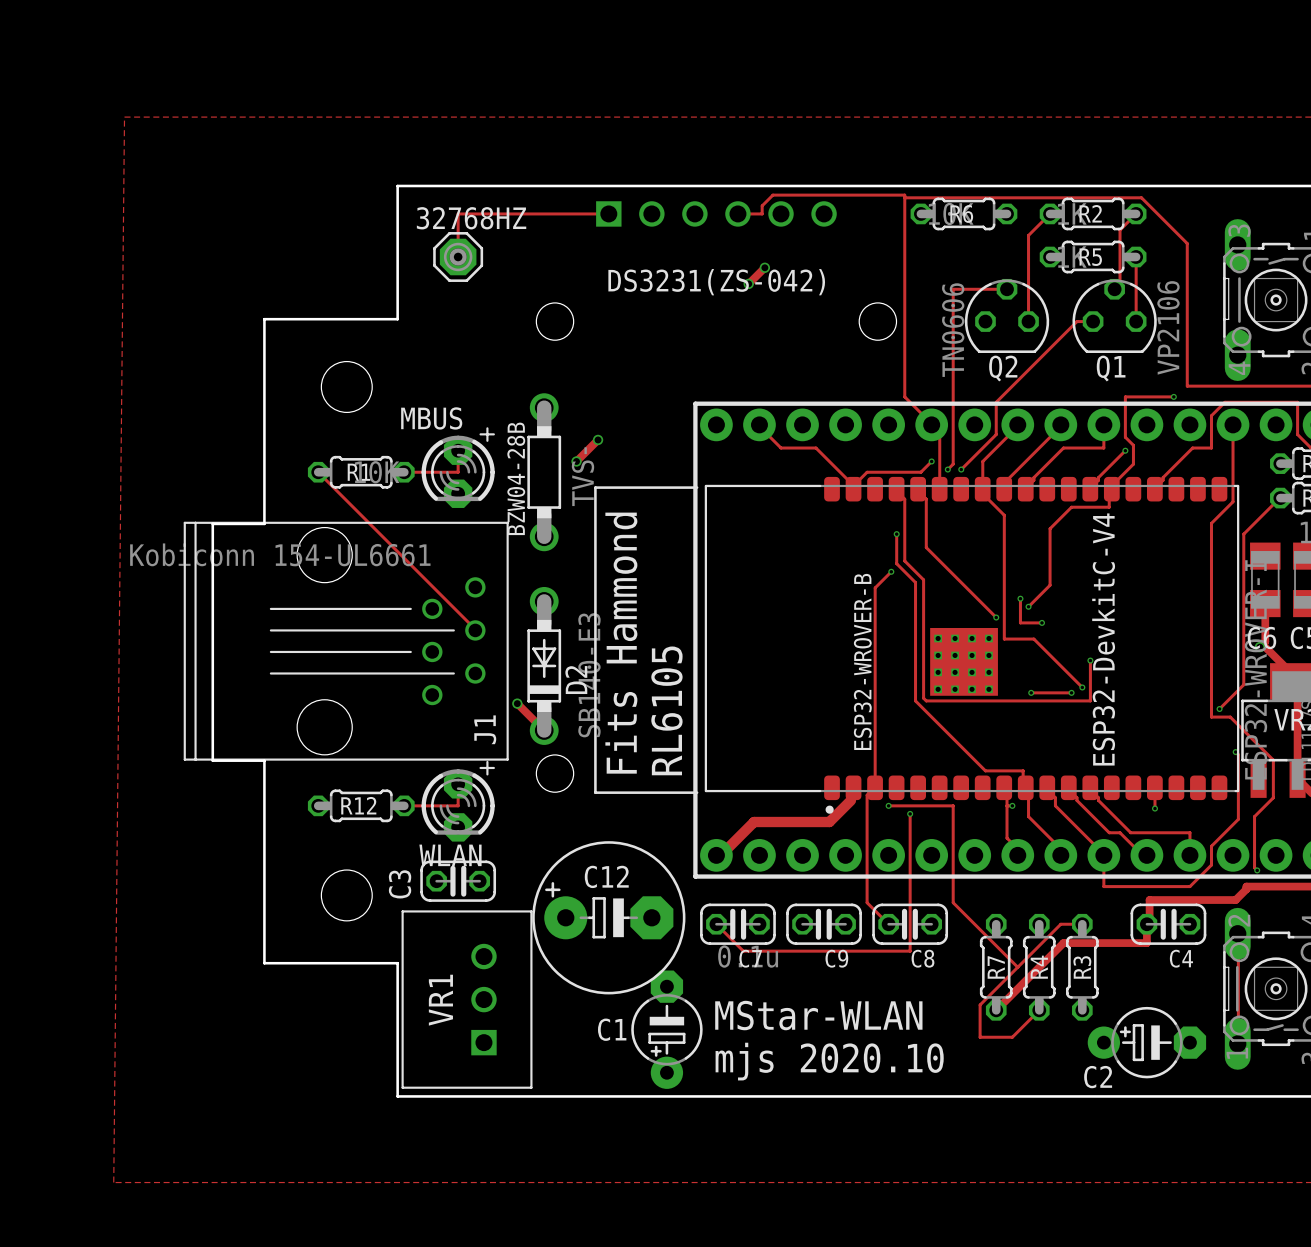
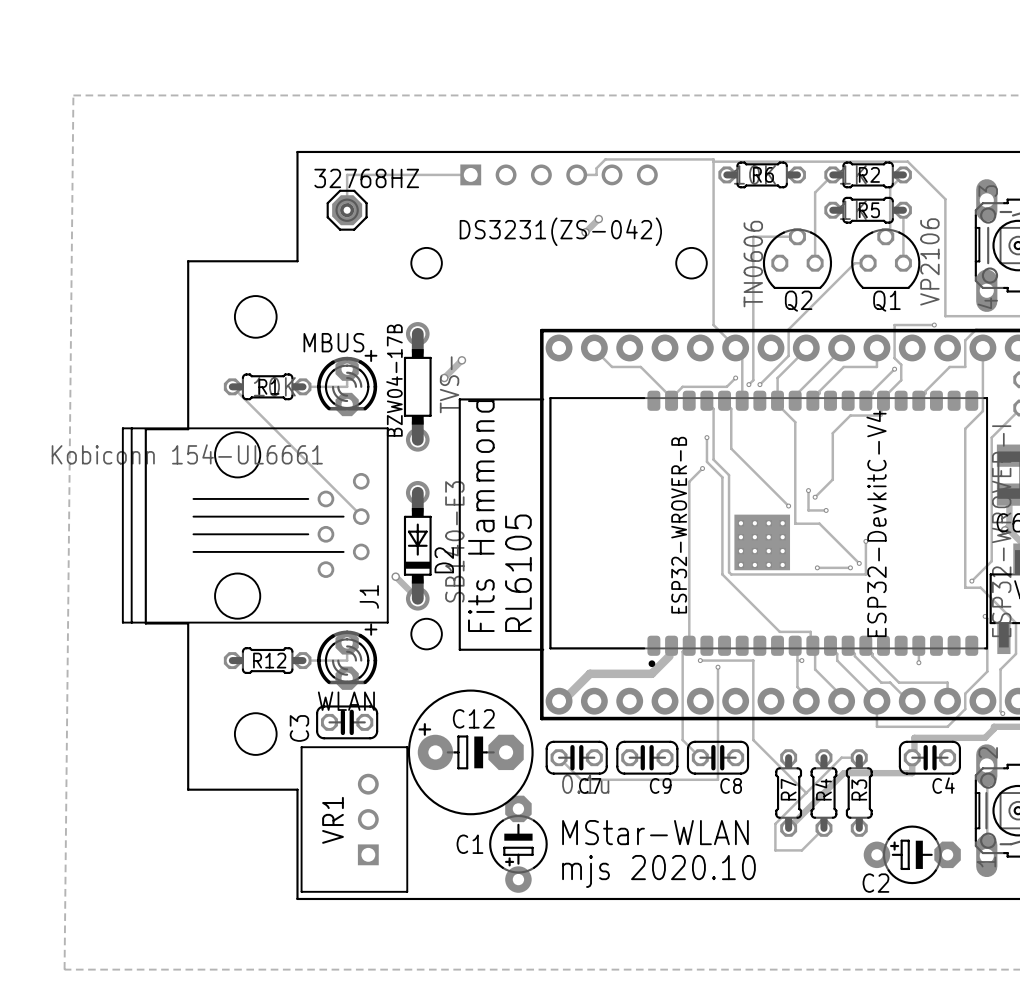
BZW04-28B name: BZW04-28B (516, 478) -> BZW04-17B (394, 380)

